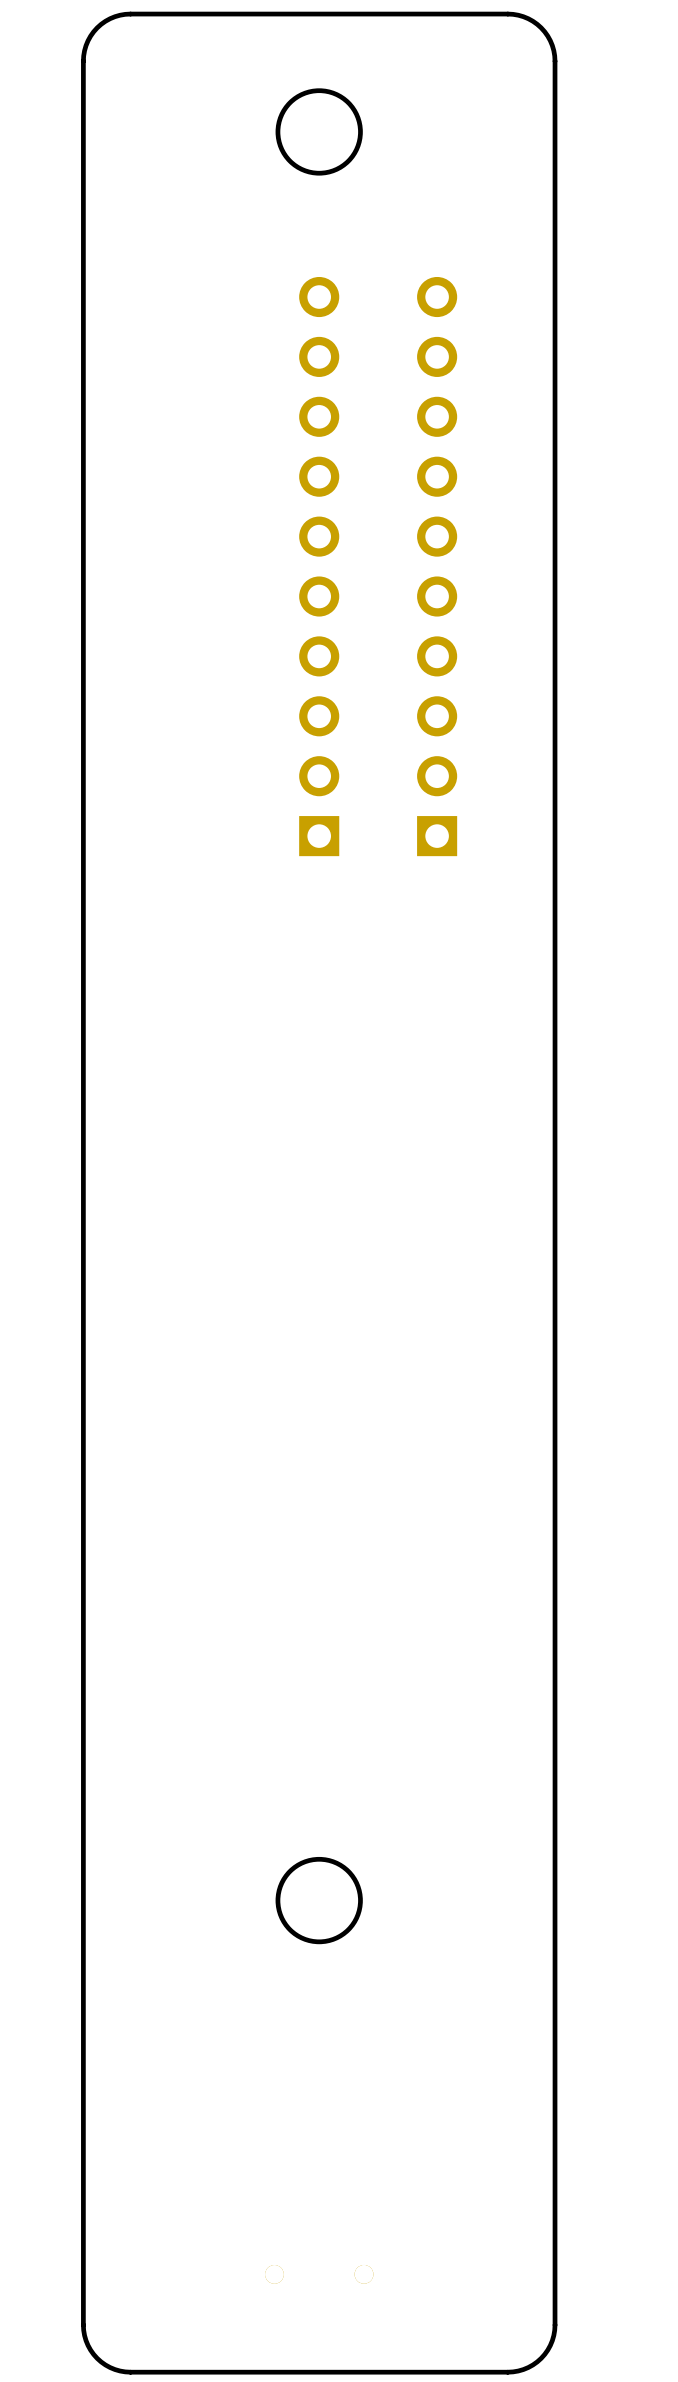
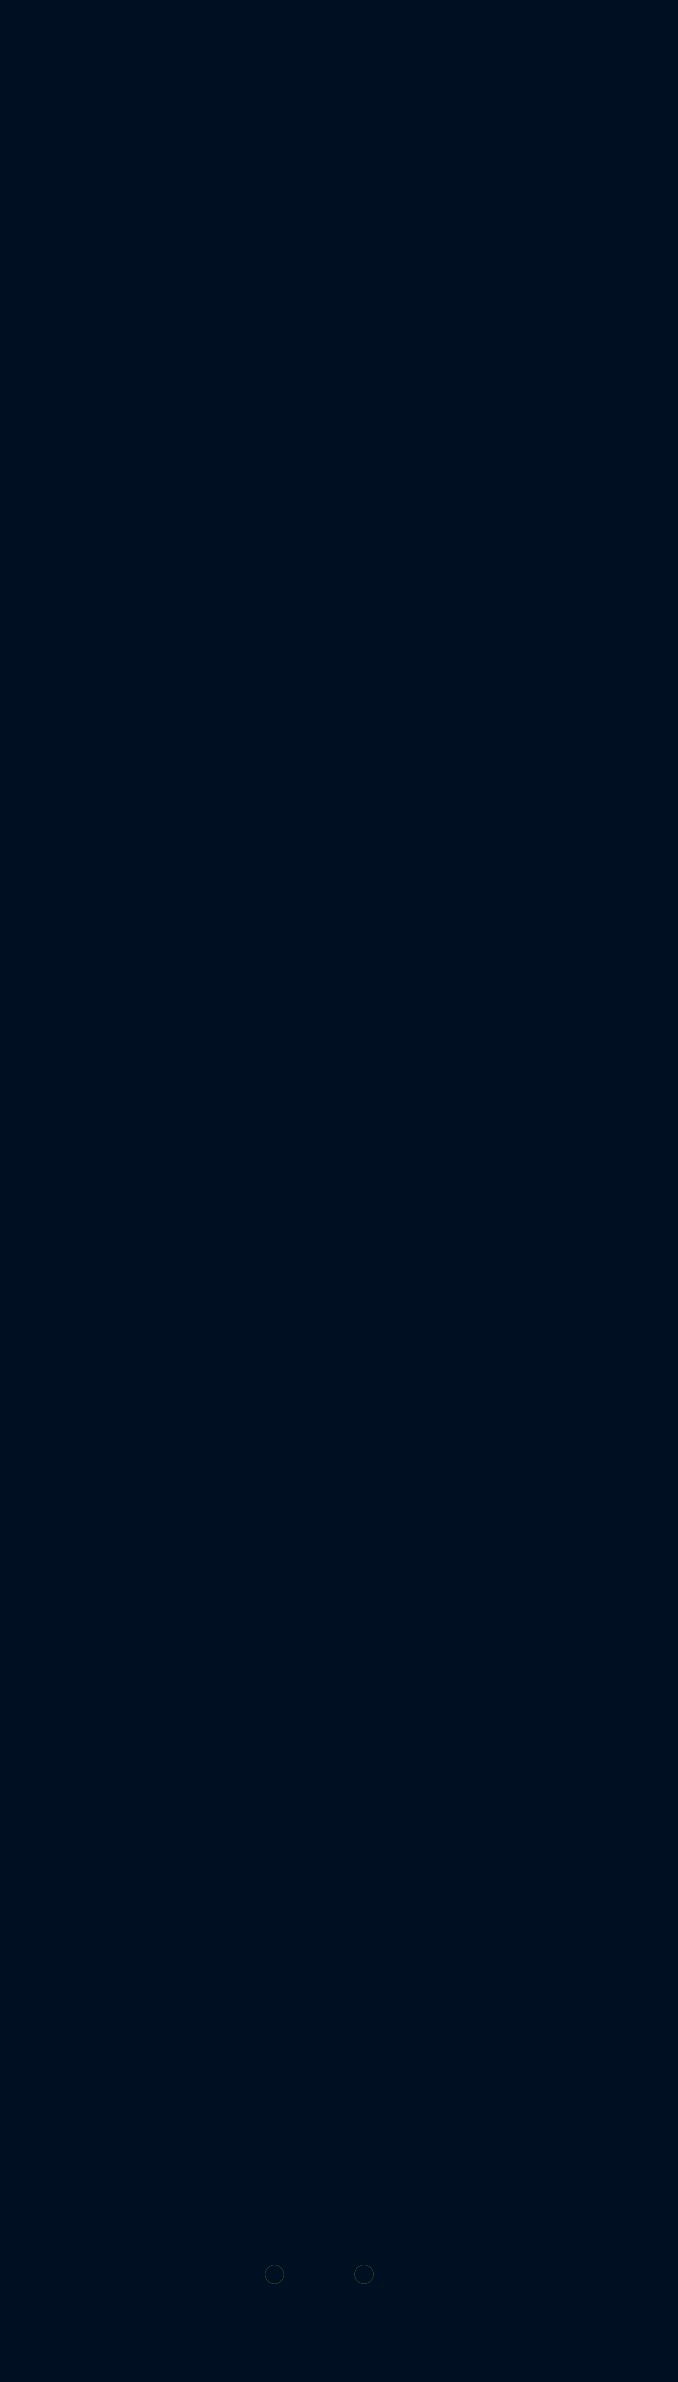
board edge: (507, 14) (125, 14) (110, 18) (97, 27) (88, 40) (83, 55) (83, 2325) (88, 2345) (97, 2358) (110, 2367) (125, 2371) (513, 2371) (528, 2367) (541, 2358) (550, 2345) (554, 2330) (555, 61) (550, 40) (541, 27) (528, 18) (507, 14) -> none
round board edge: [275, 88, 363, 176] -> none
part: (319, 566) -> none
part: (437, 566) -> none
round board edge: [275, 1856, 363, 1945] -> none

